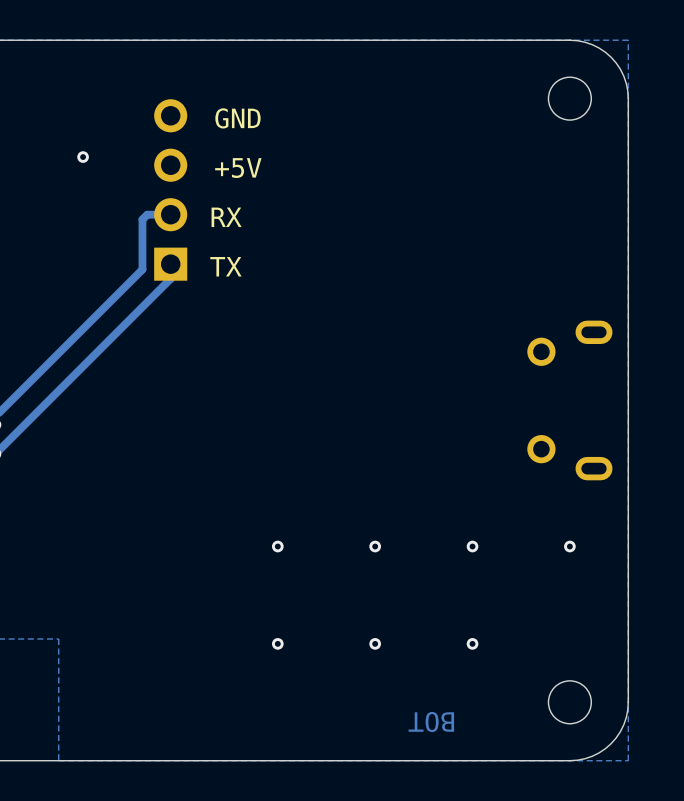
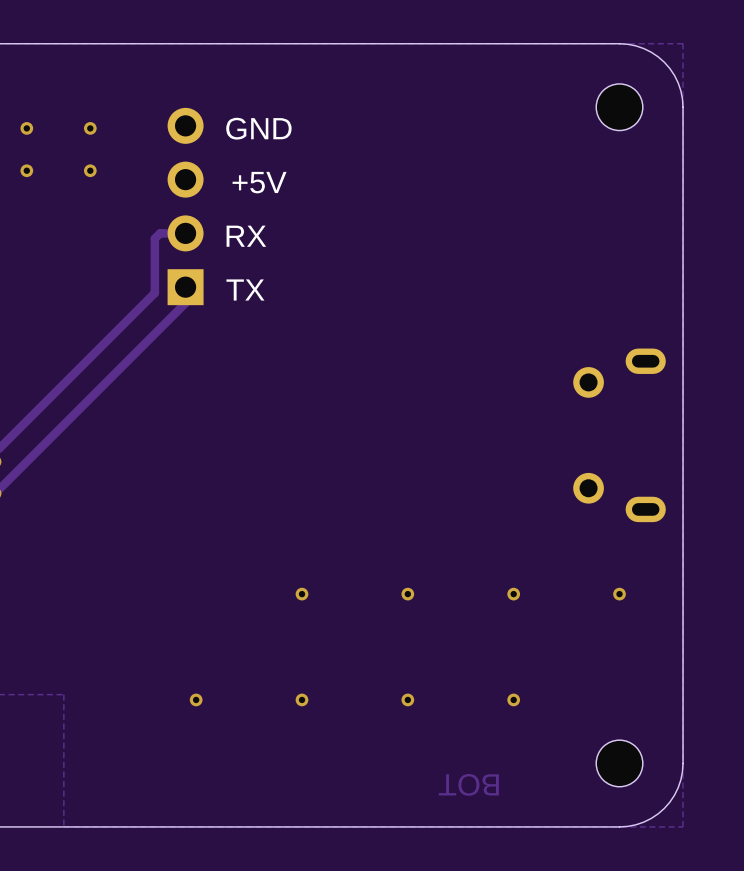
via: none -> (26, 128)
via: none -> (90, 128)
via: none -> (26, 170)
via: none -> (196, 699)

